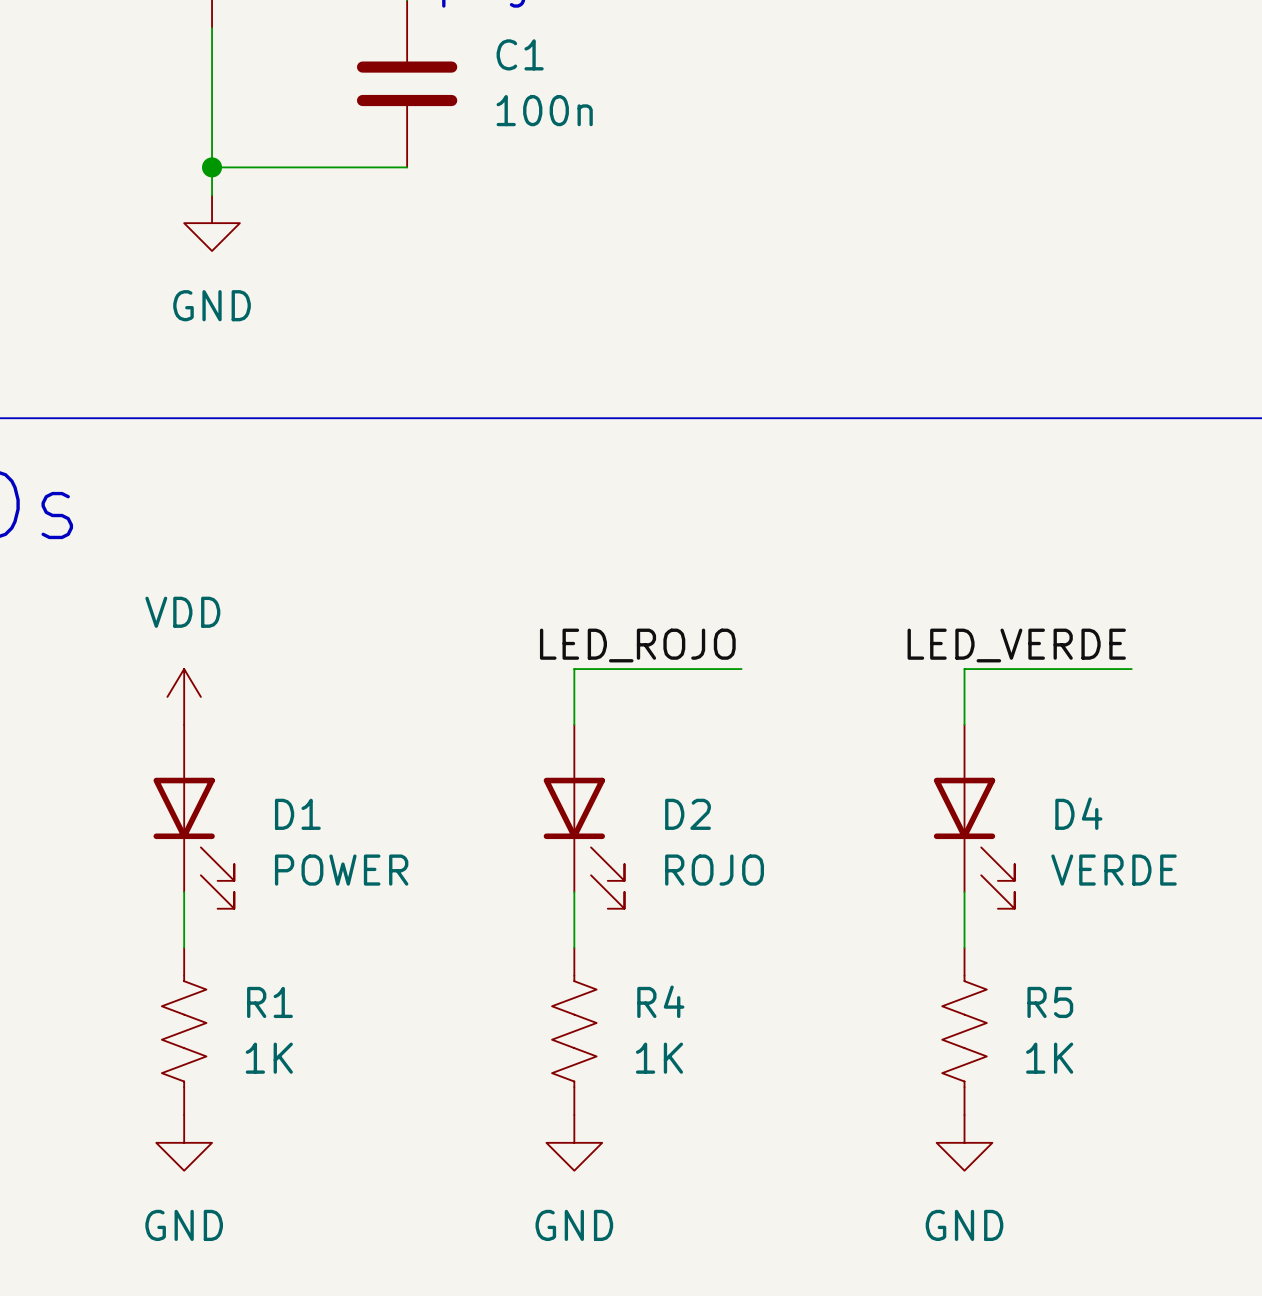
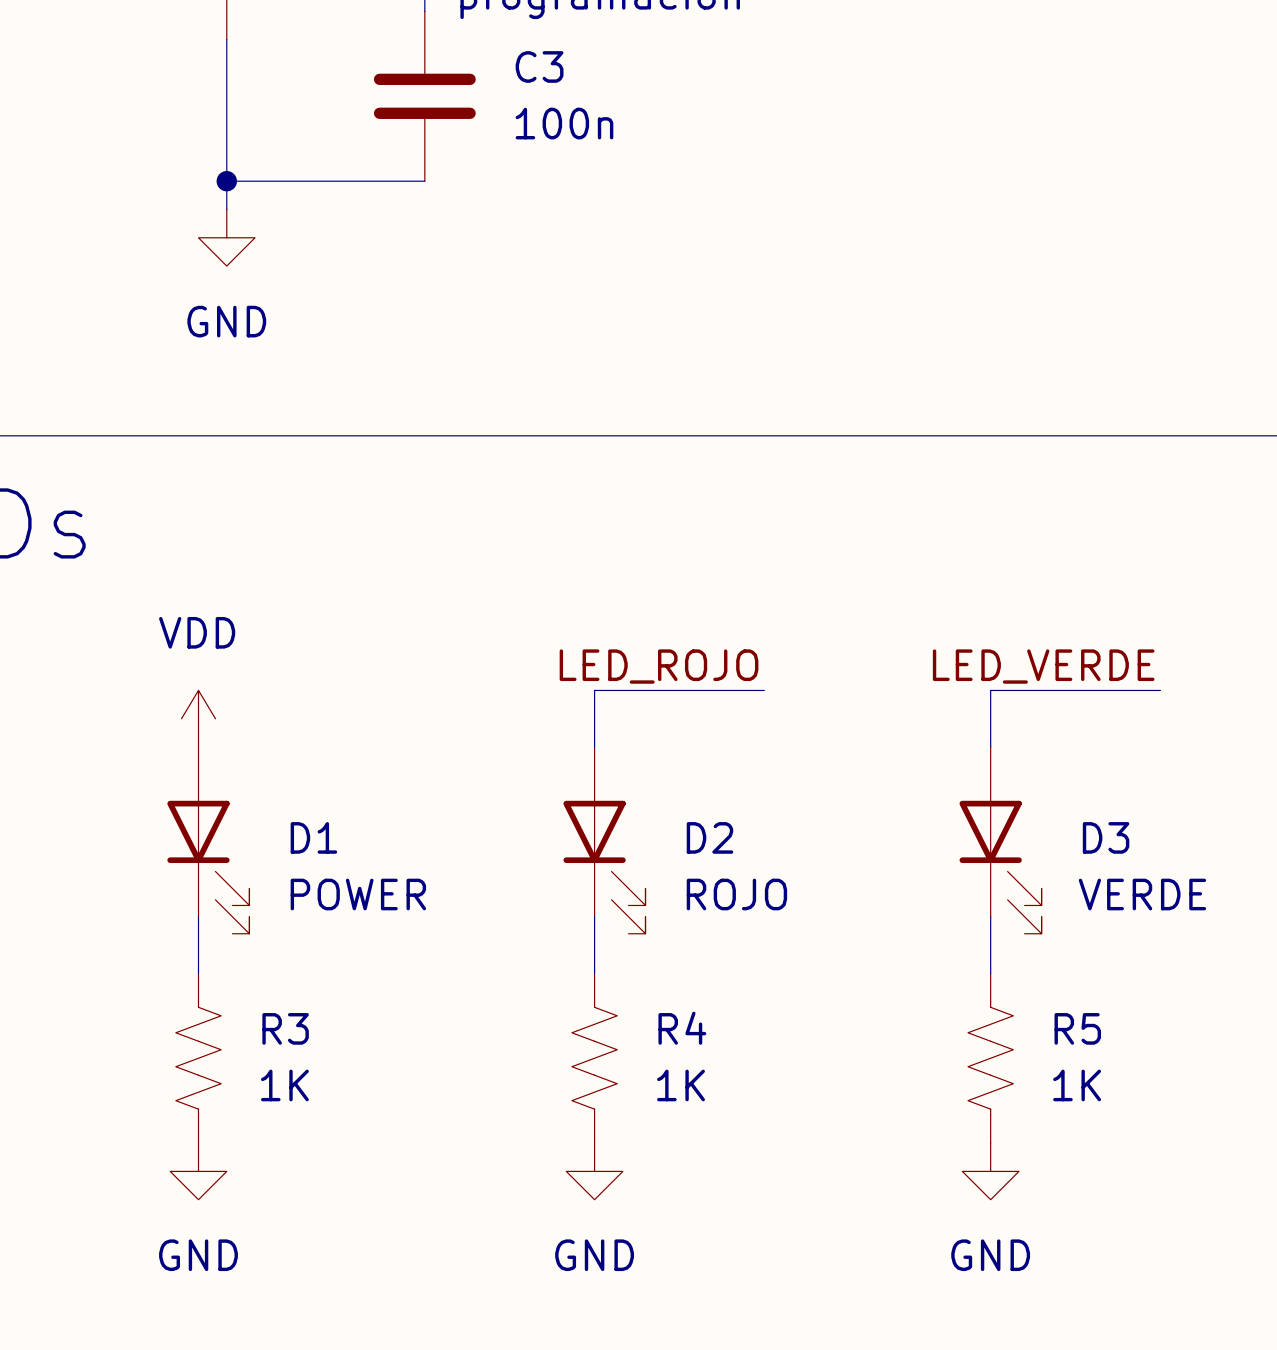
C1 name: C1 (520, 54) -> C3 (539, 66)
D4 name: D4 (1078, 813) -> D3 (1106, 837)
R1 name: R1 (269, 1002) -> R3 (285, 1028)

